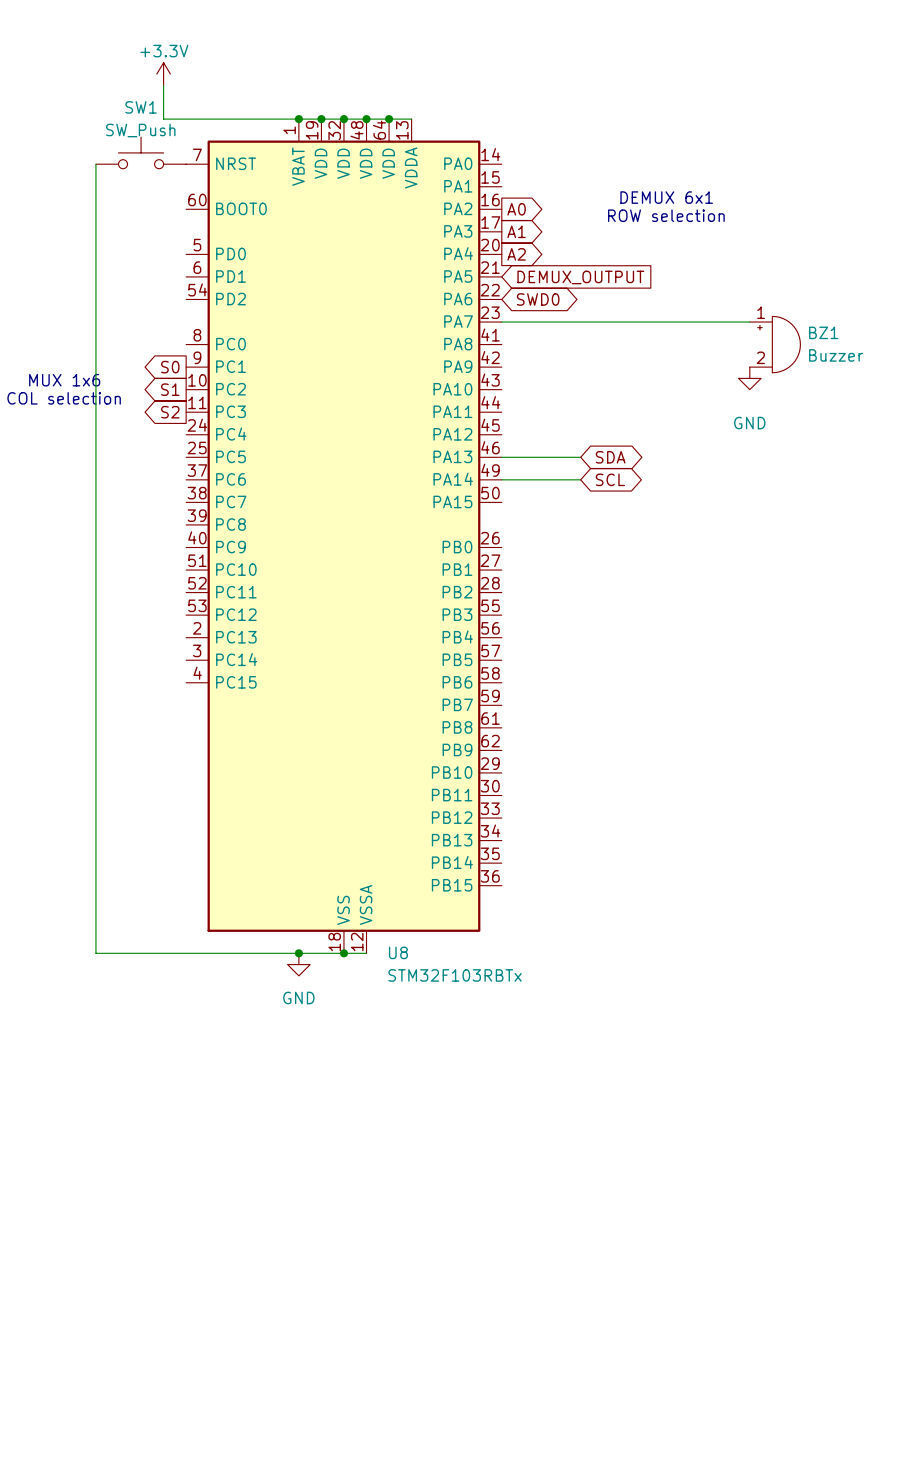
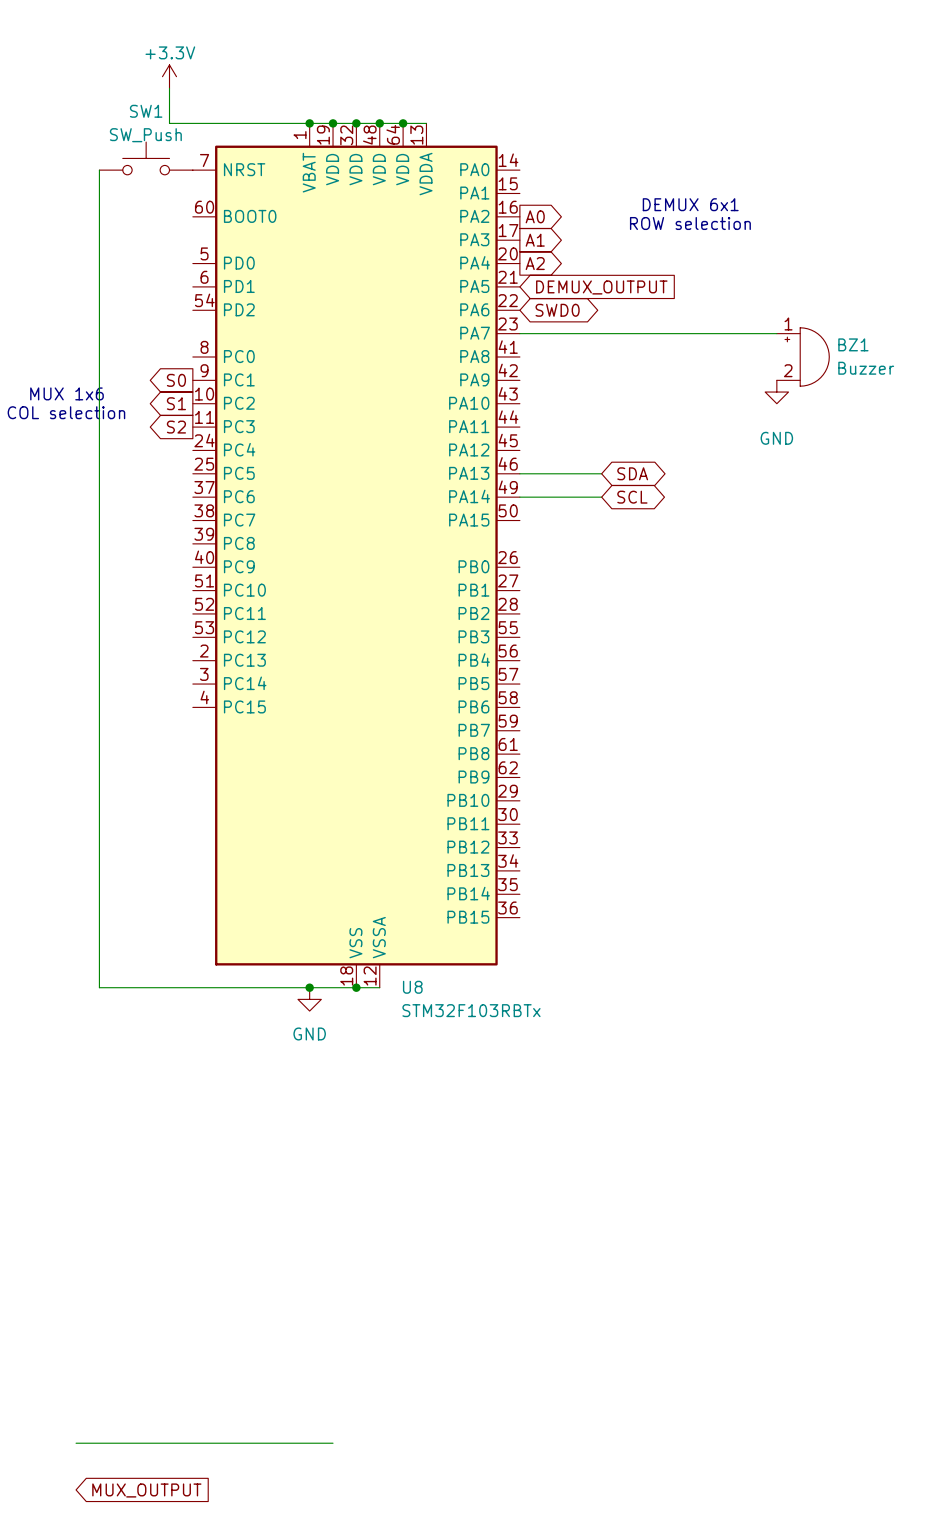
wire: none -> (76, 1443) (333, 1443)
global label: none -> MUX_OUTPUT (146, 1490)

